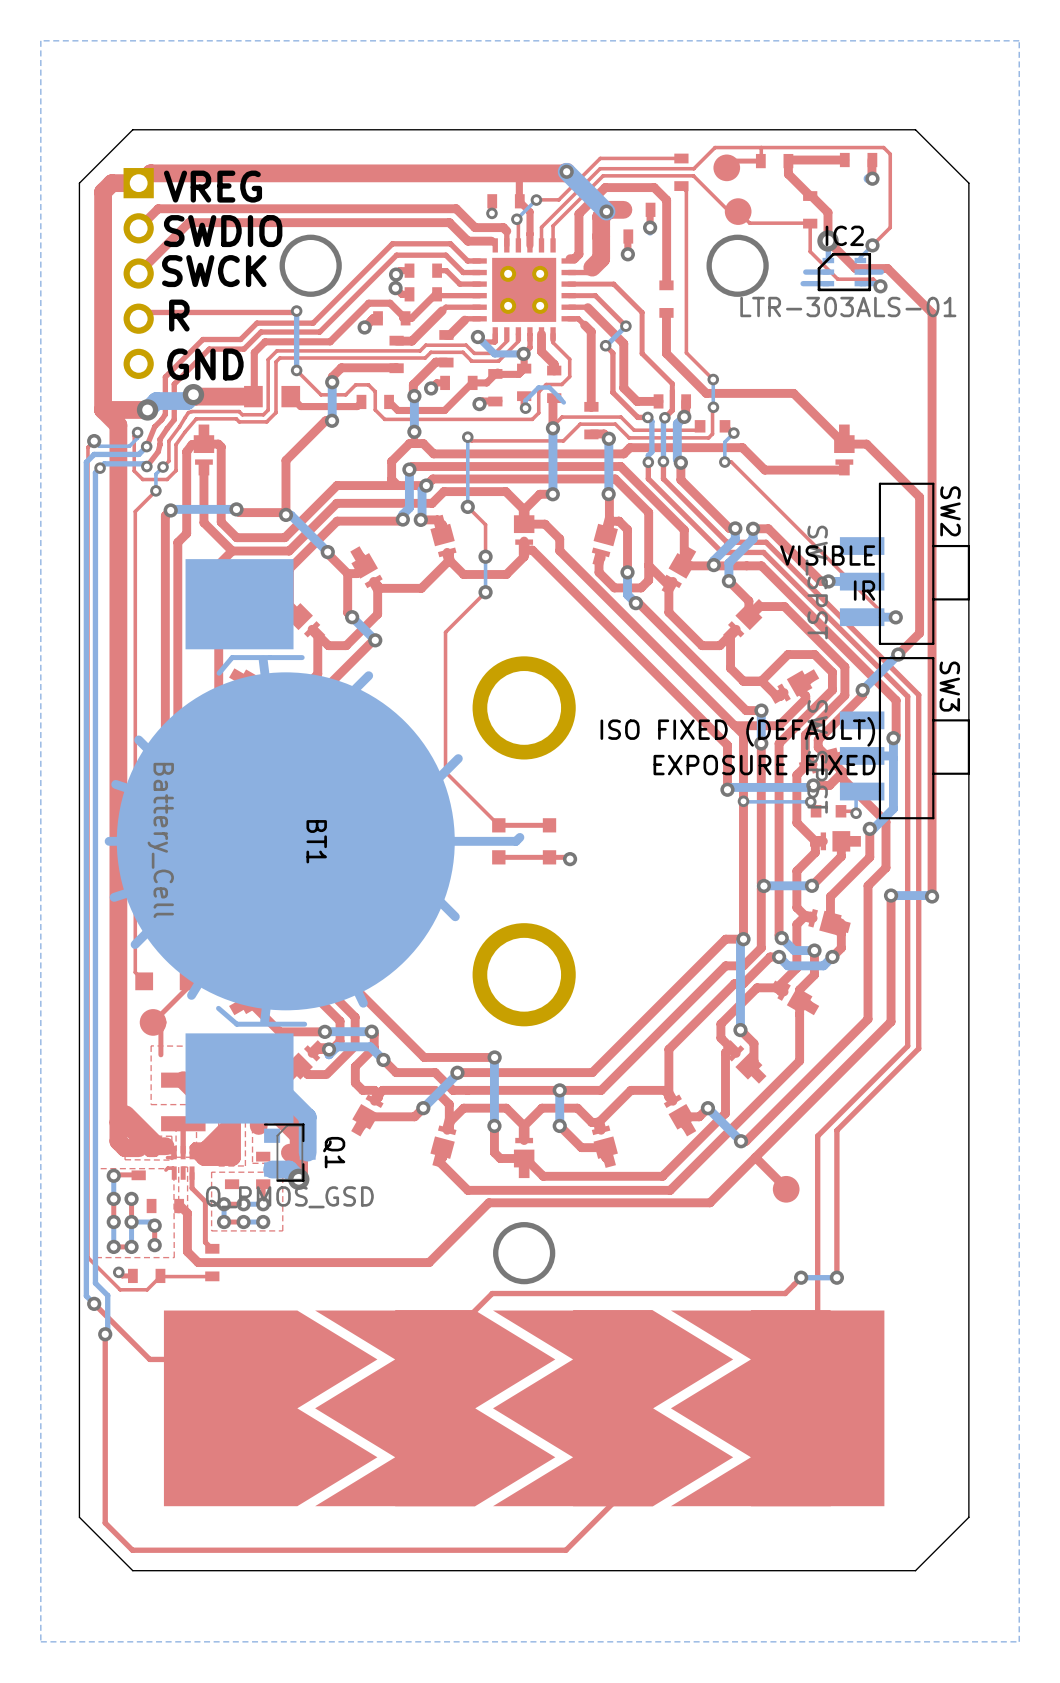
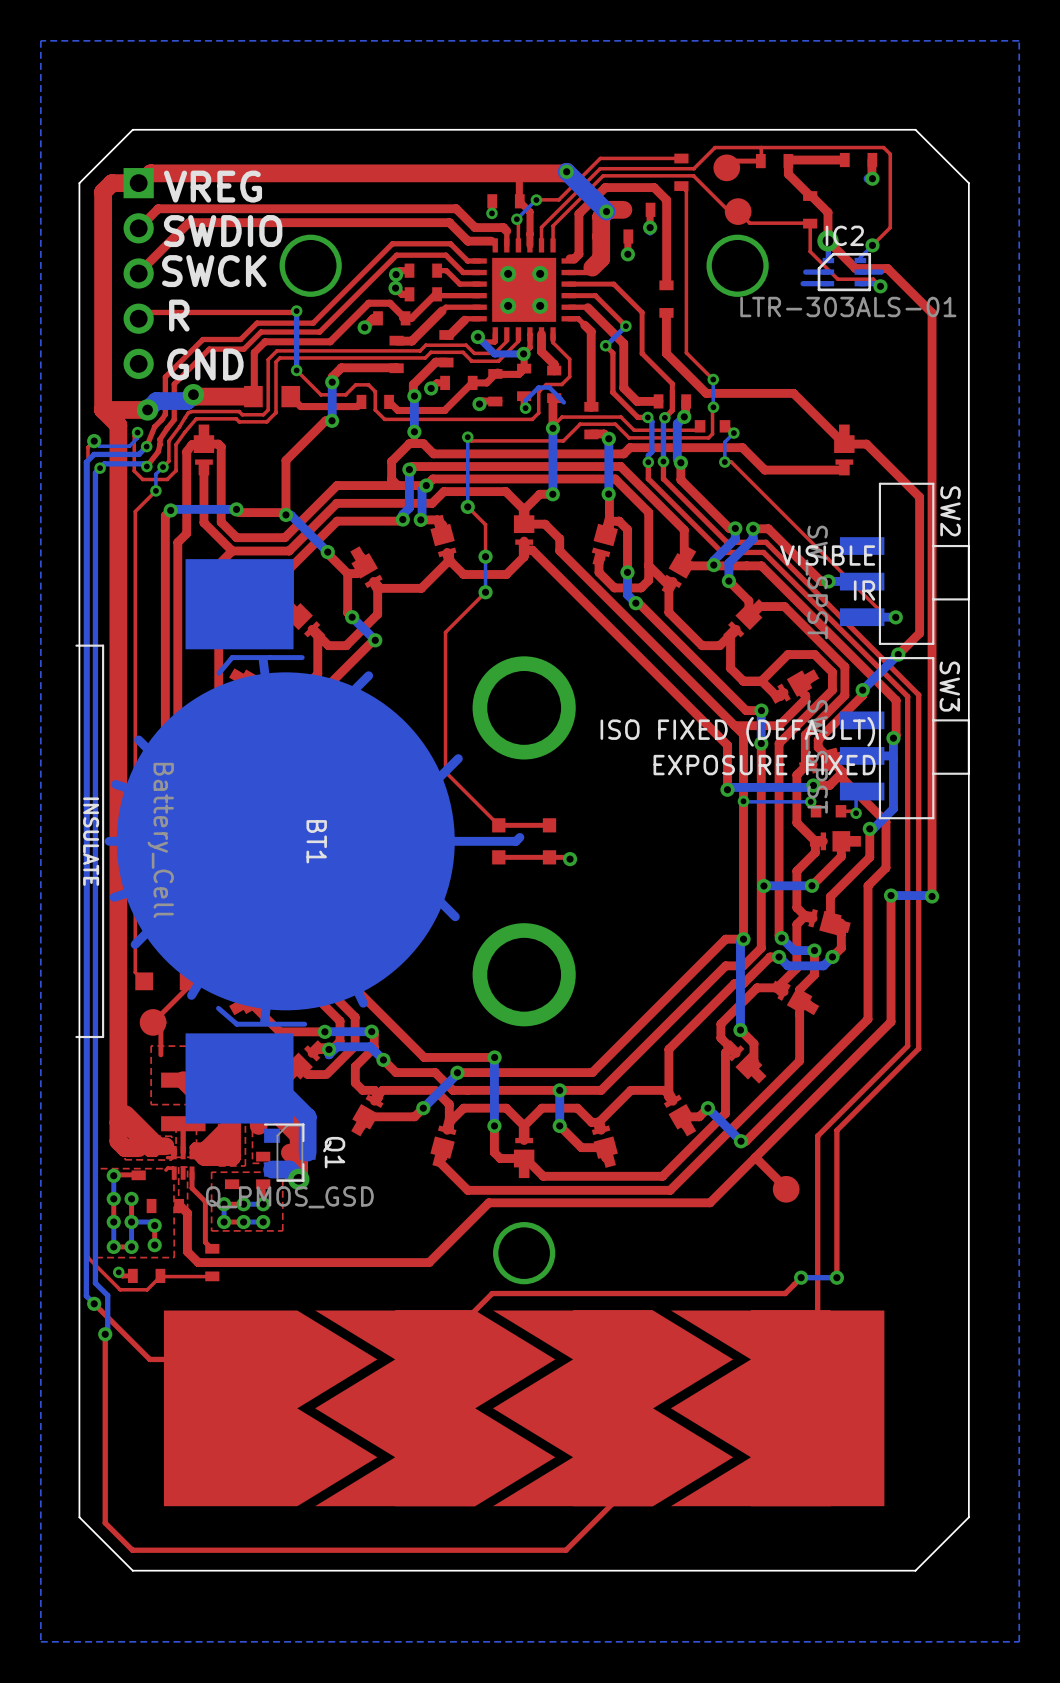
line: none -> (76, 645) (103, 645) (103, 1037) (76, 1037)
text: none -> INSULATE (91, 841)

